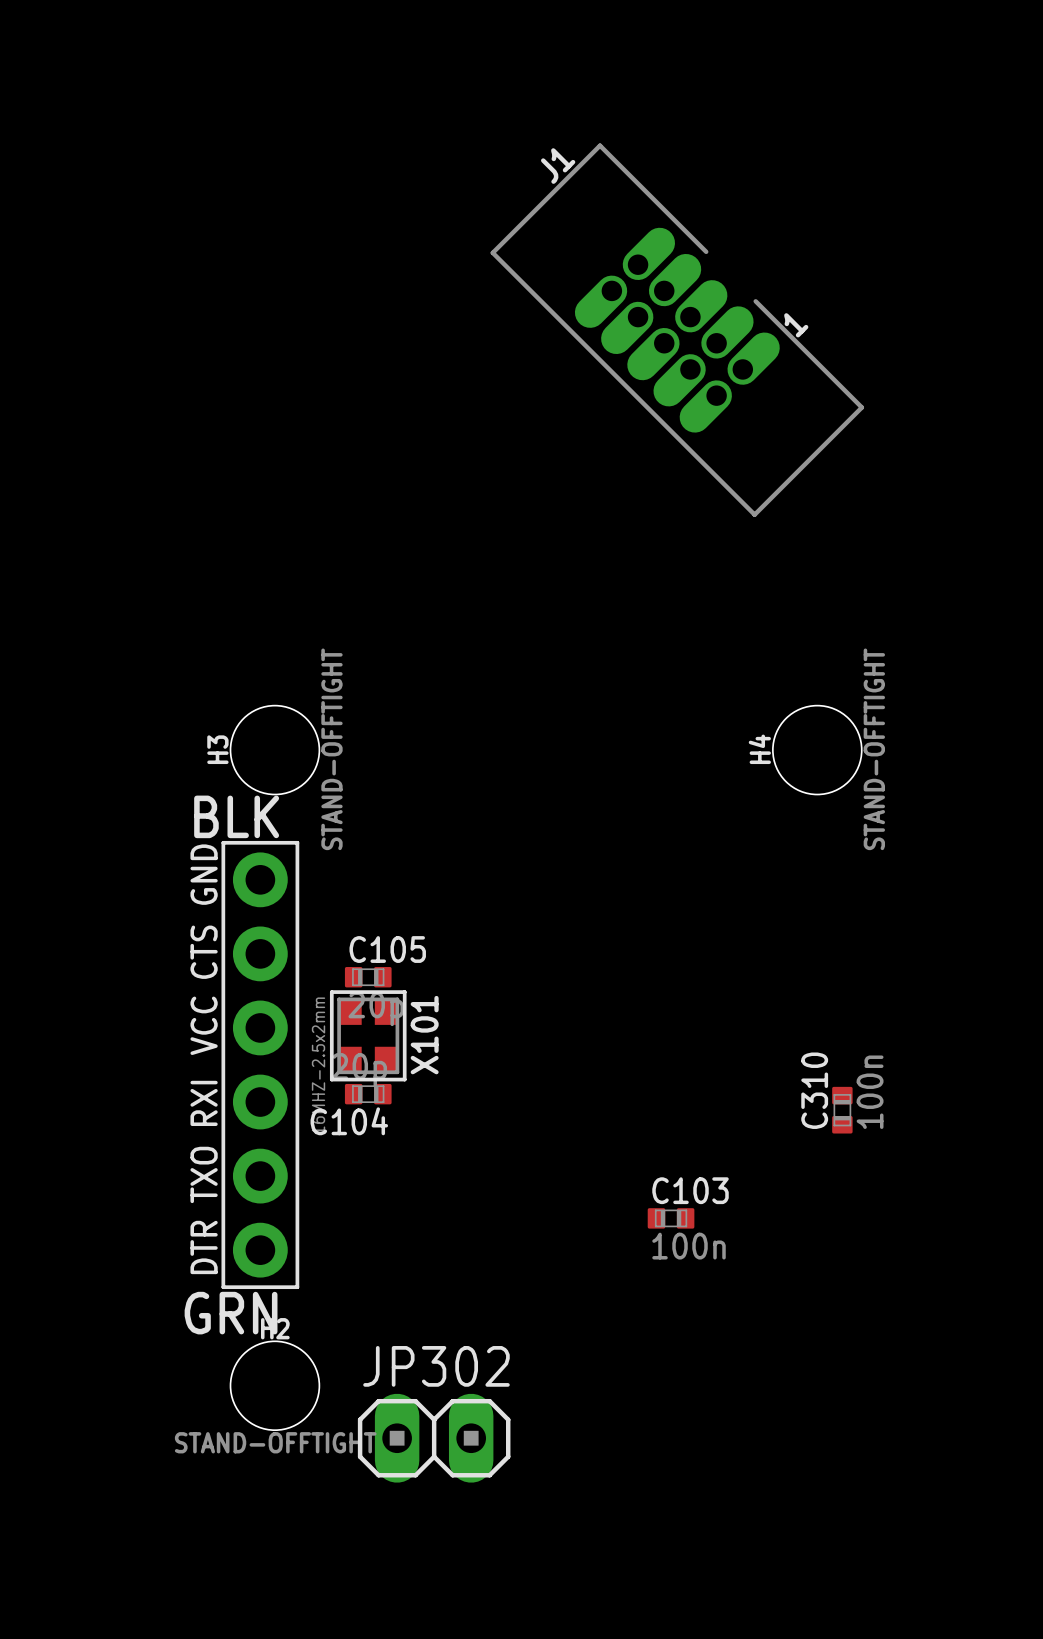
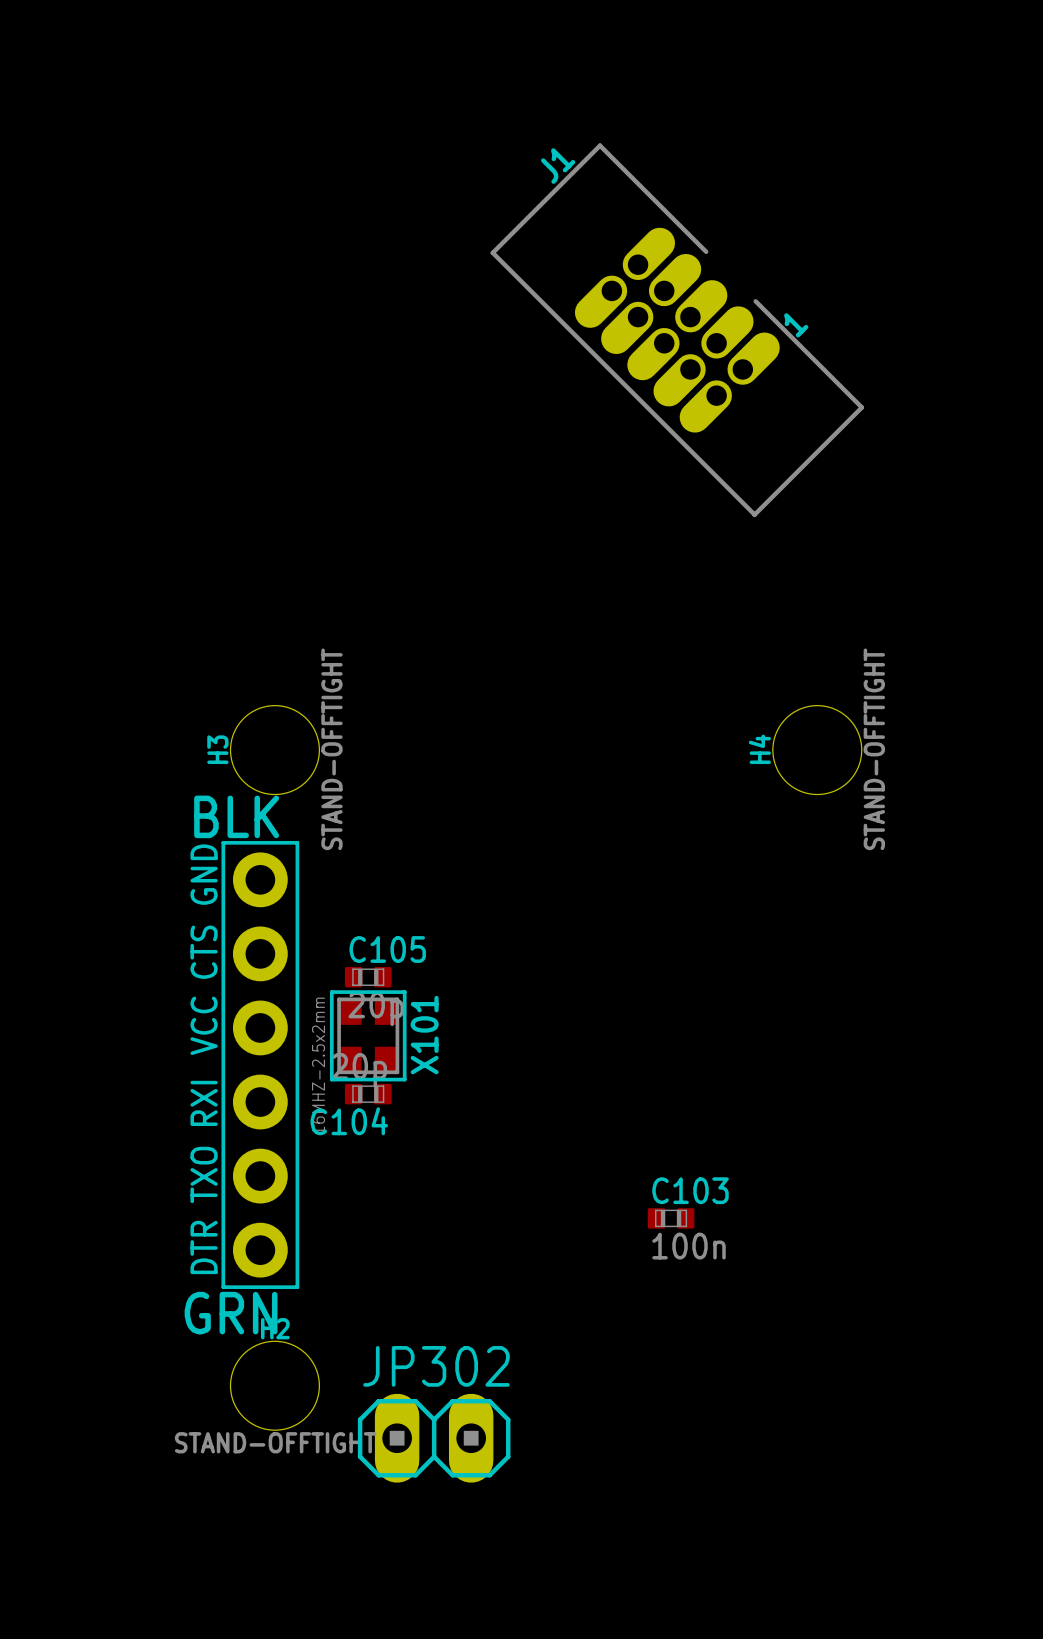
C310: 100n (842, 1110) -> none

